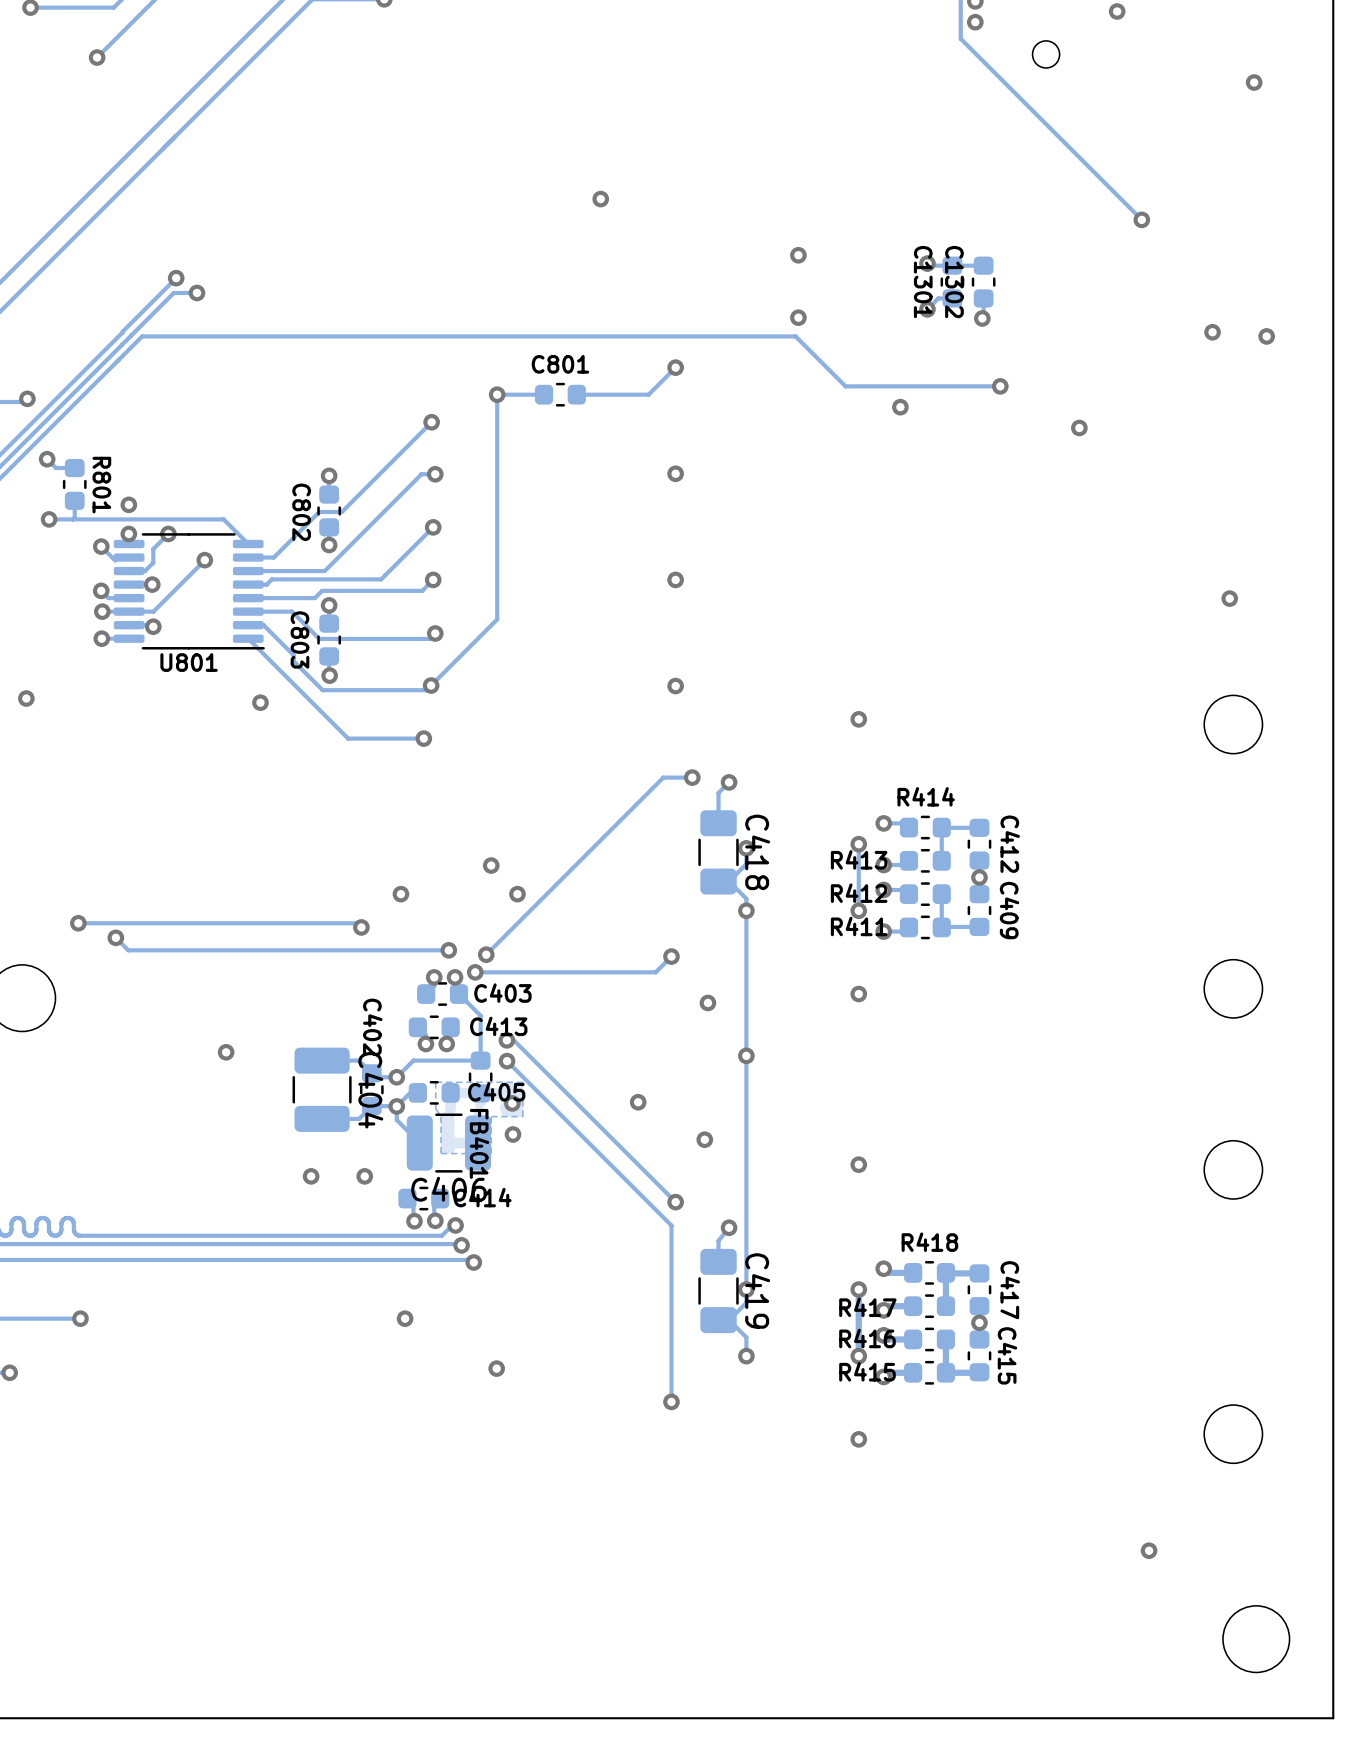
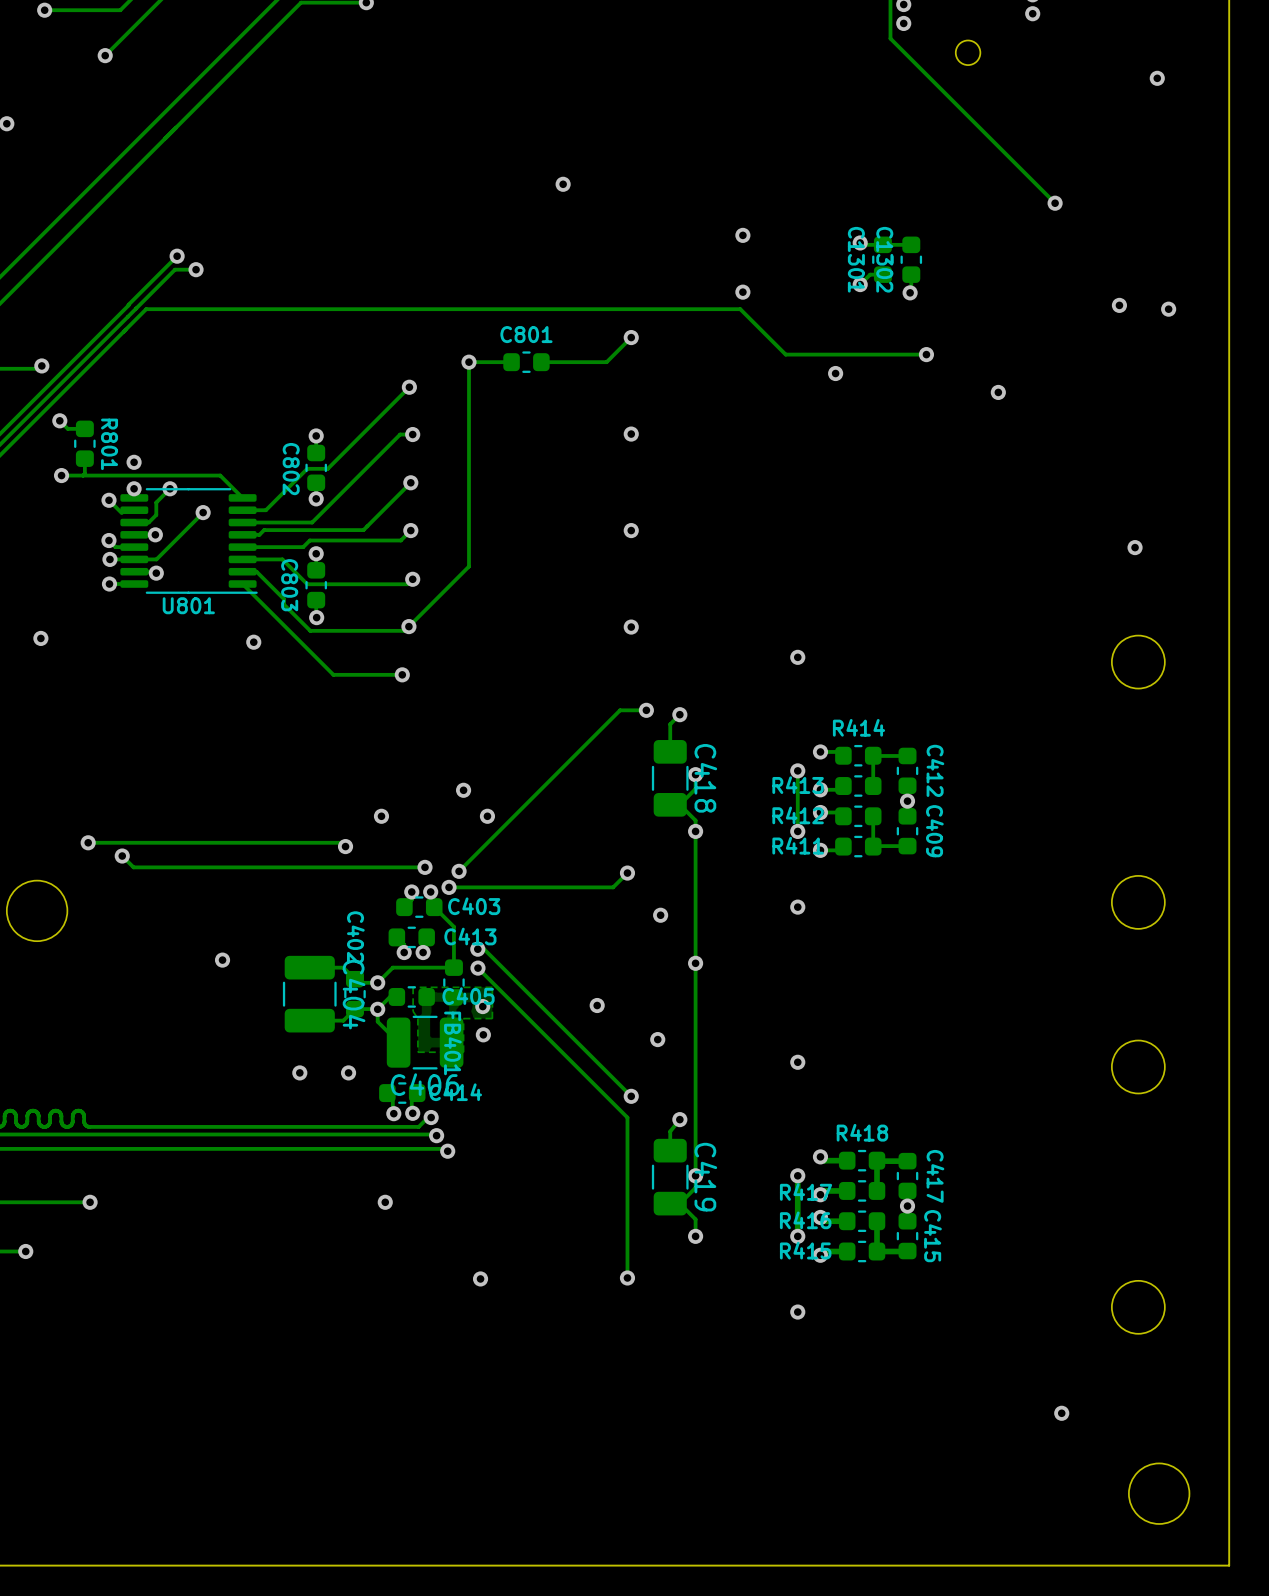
via position: (496, 1368) -> (480, 1278)

